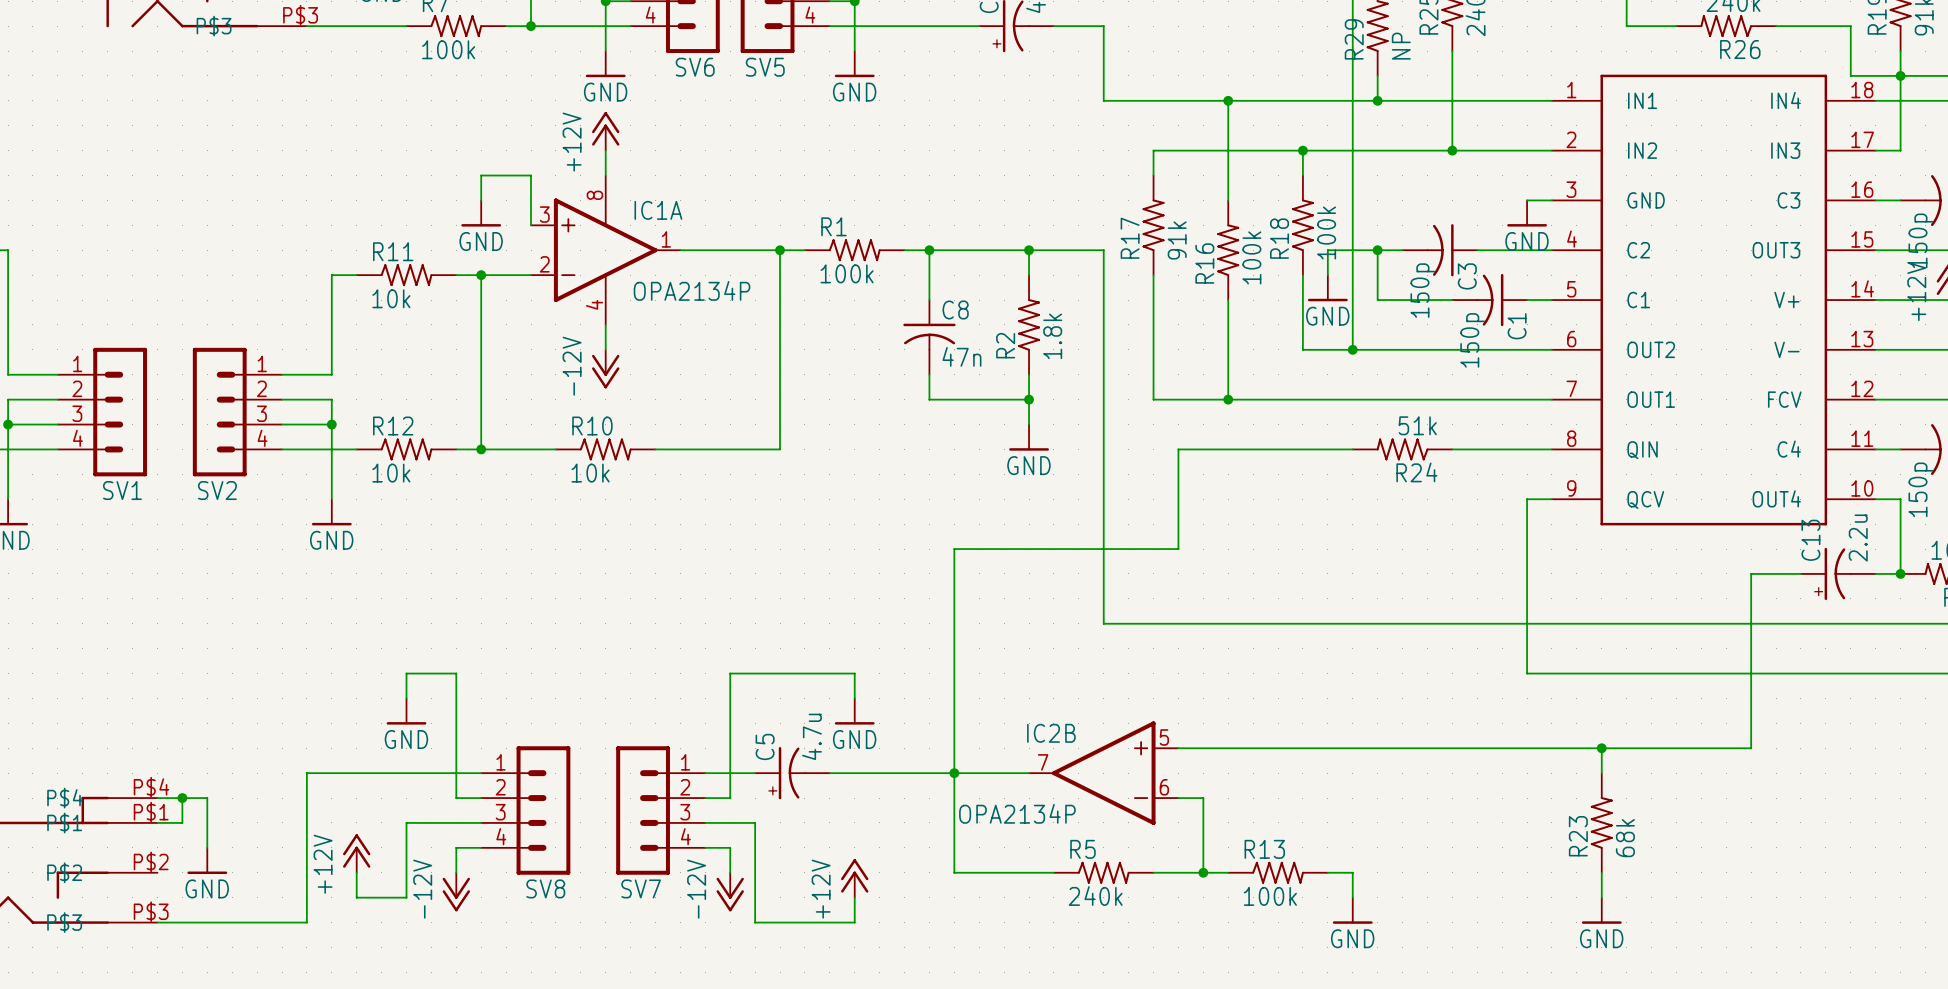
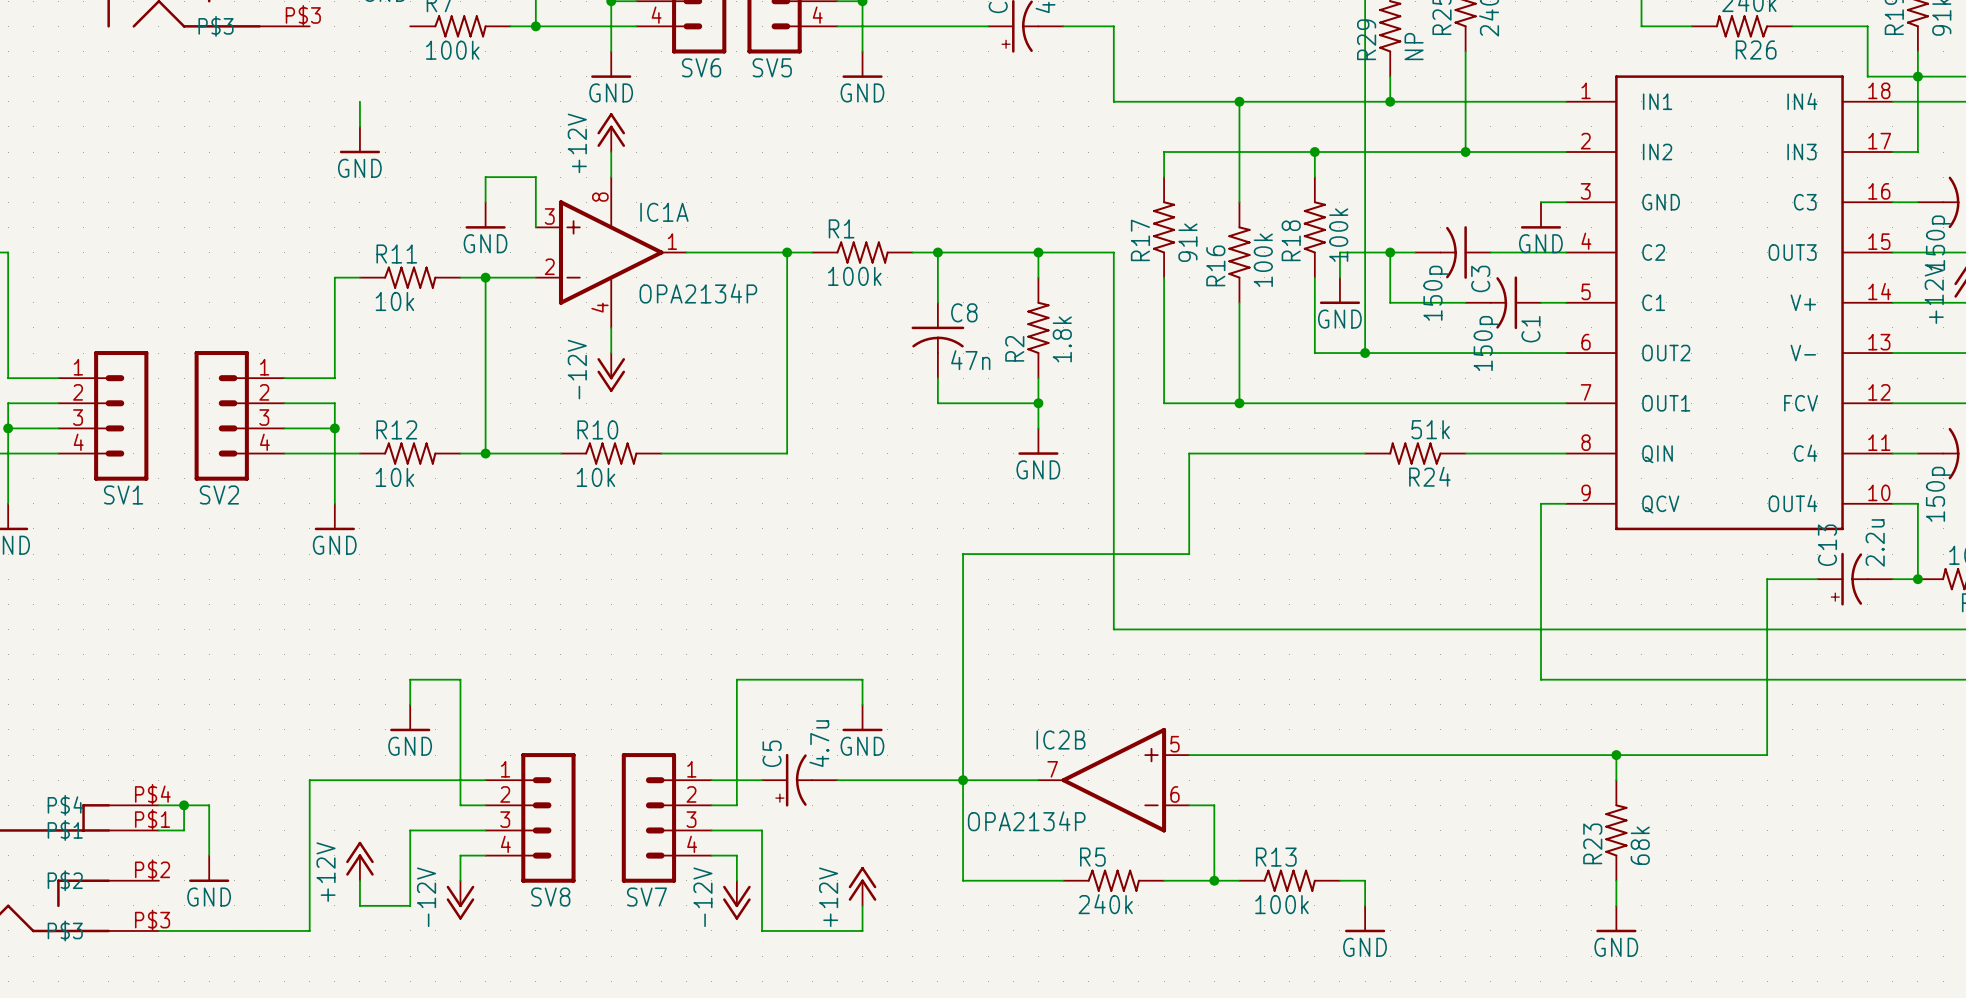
wire: (306, 26) (406, 26) -> none
wire: none -> (359, 101) (359, 126)
power symbol: none -> GND (359, 140)

